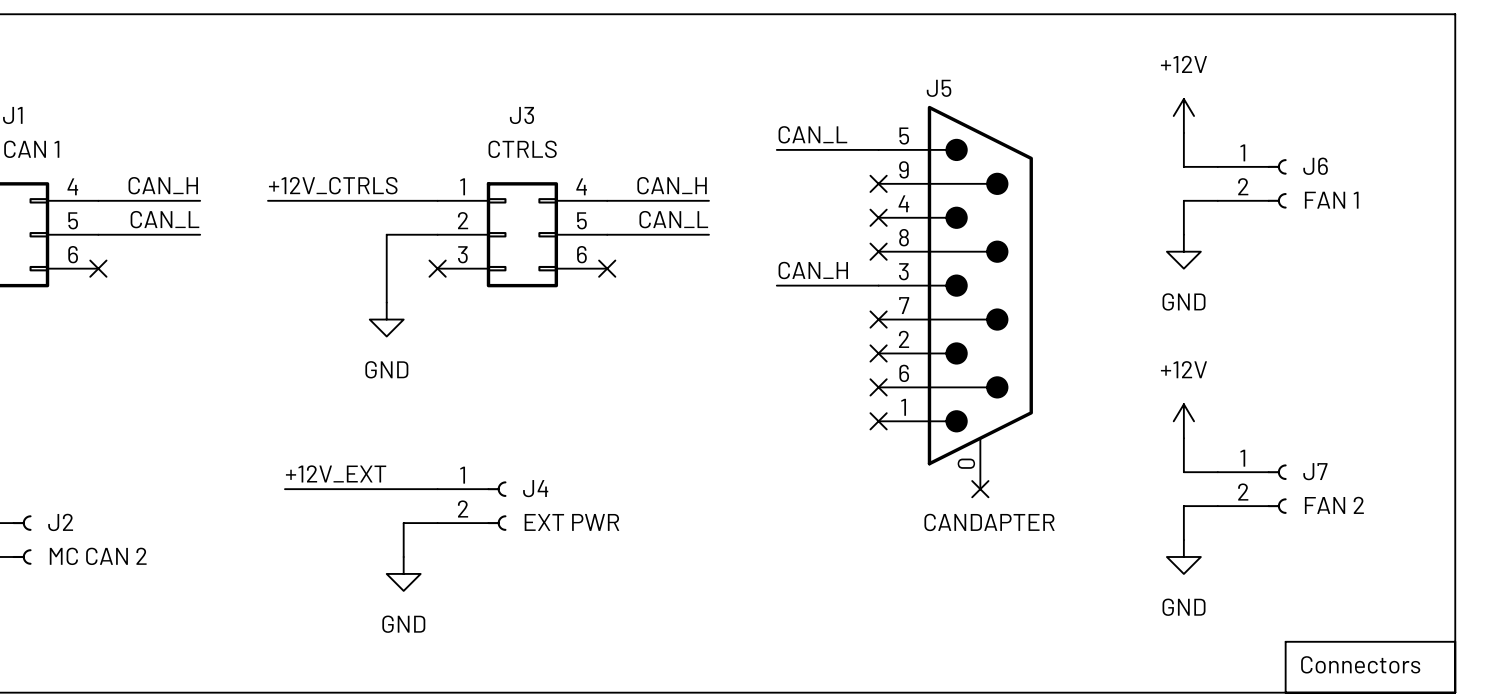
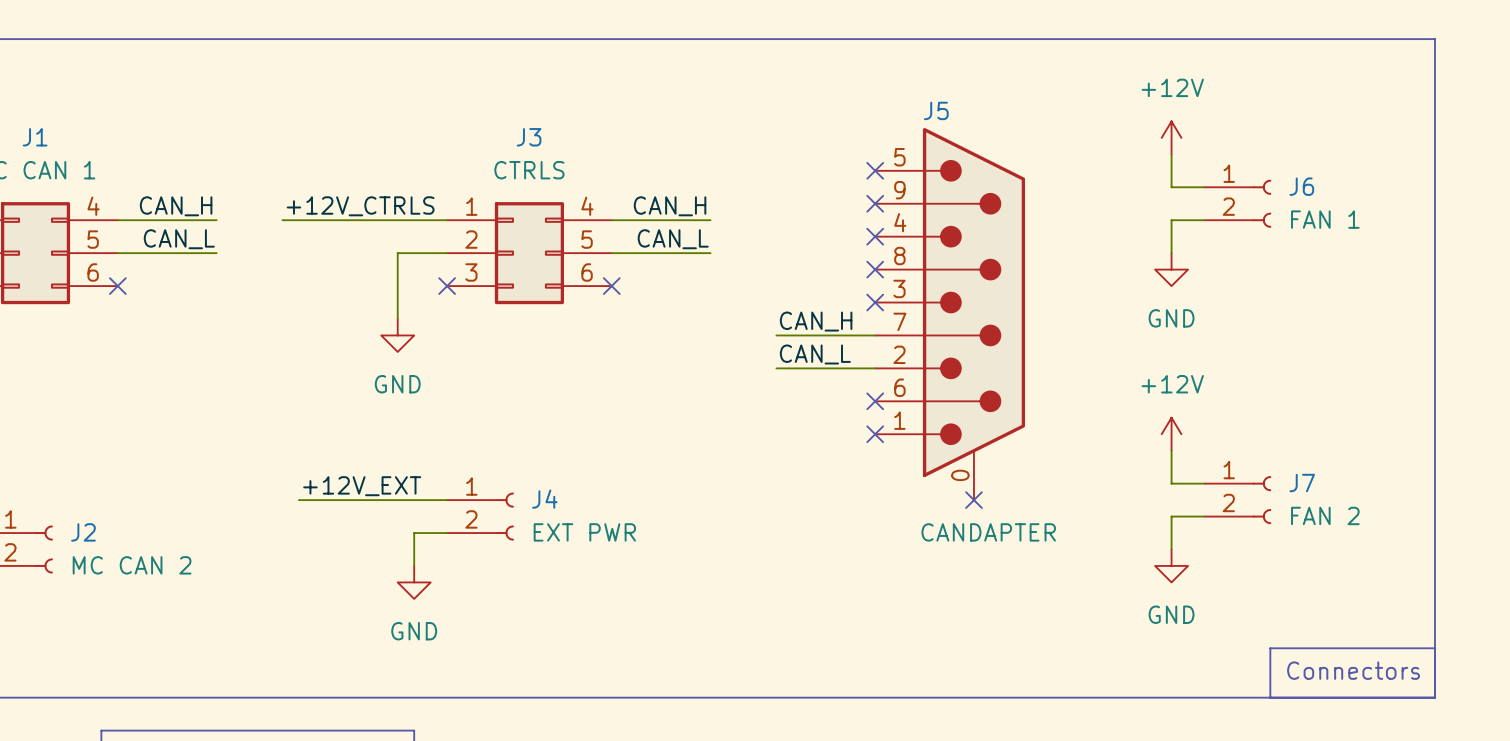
label position: CAN_L (812, 134) -> CAN_L (815, 354)
wire: (776, 149) (878, 149) -> (776, 368) (875, 368)
no-connect mark: none -> (875, 170)
label position: CAN_H (813, 270) -> CAN_H (816, 321)
wire: (776, 285) (878, 285) -> (776, 335) (875, 335)
no-connect mark: none -> (875, 302)
no-connect mark: (878, 319) -> none
no-connect mark: (878, 353) -> none

